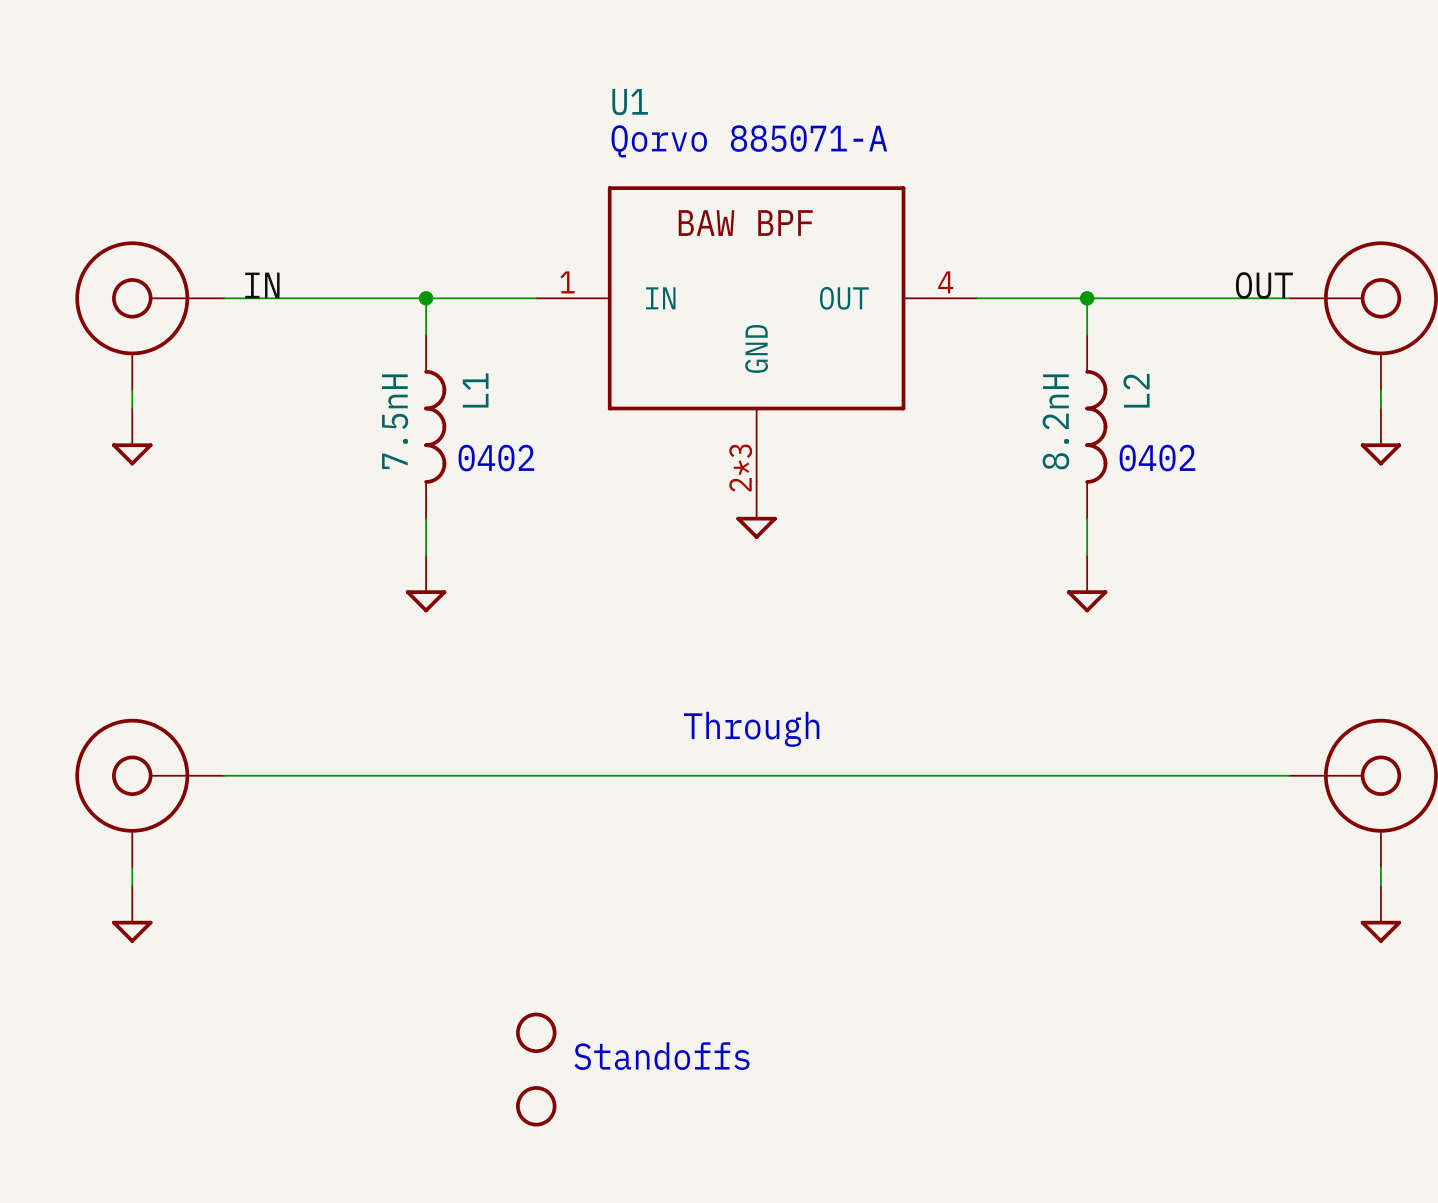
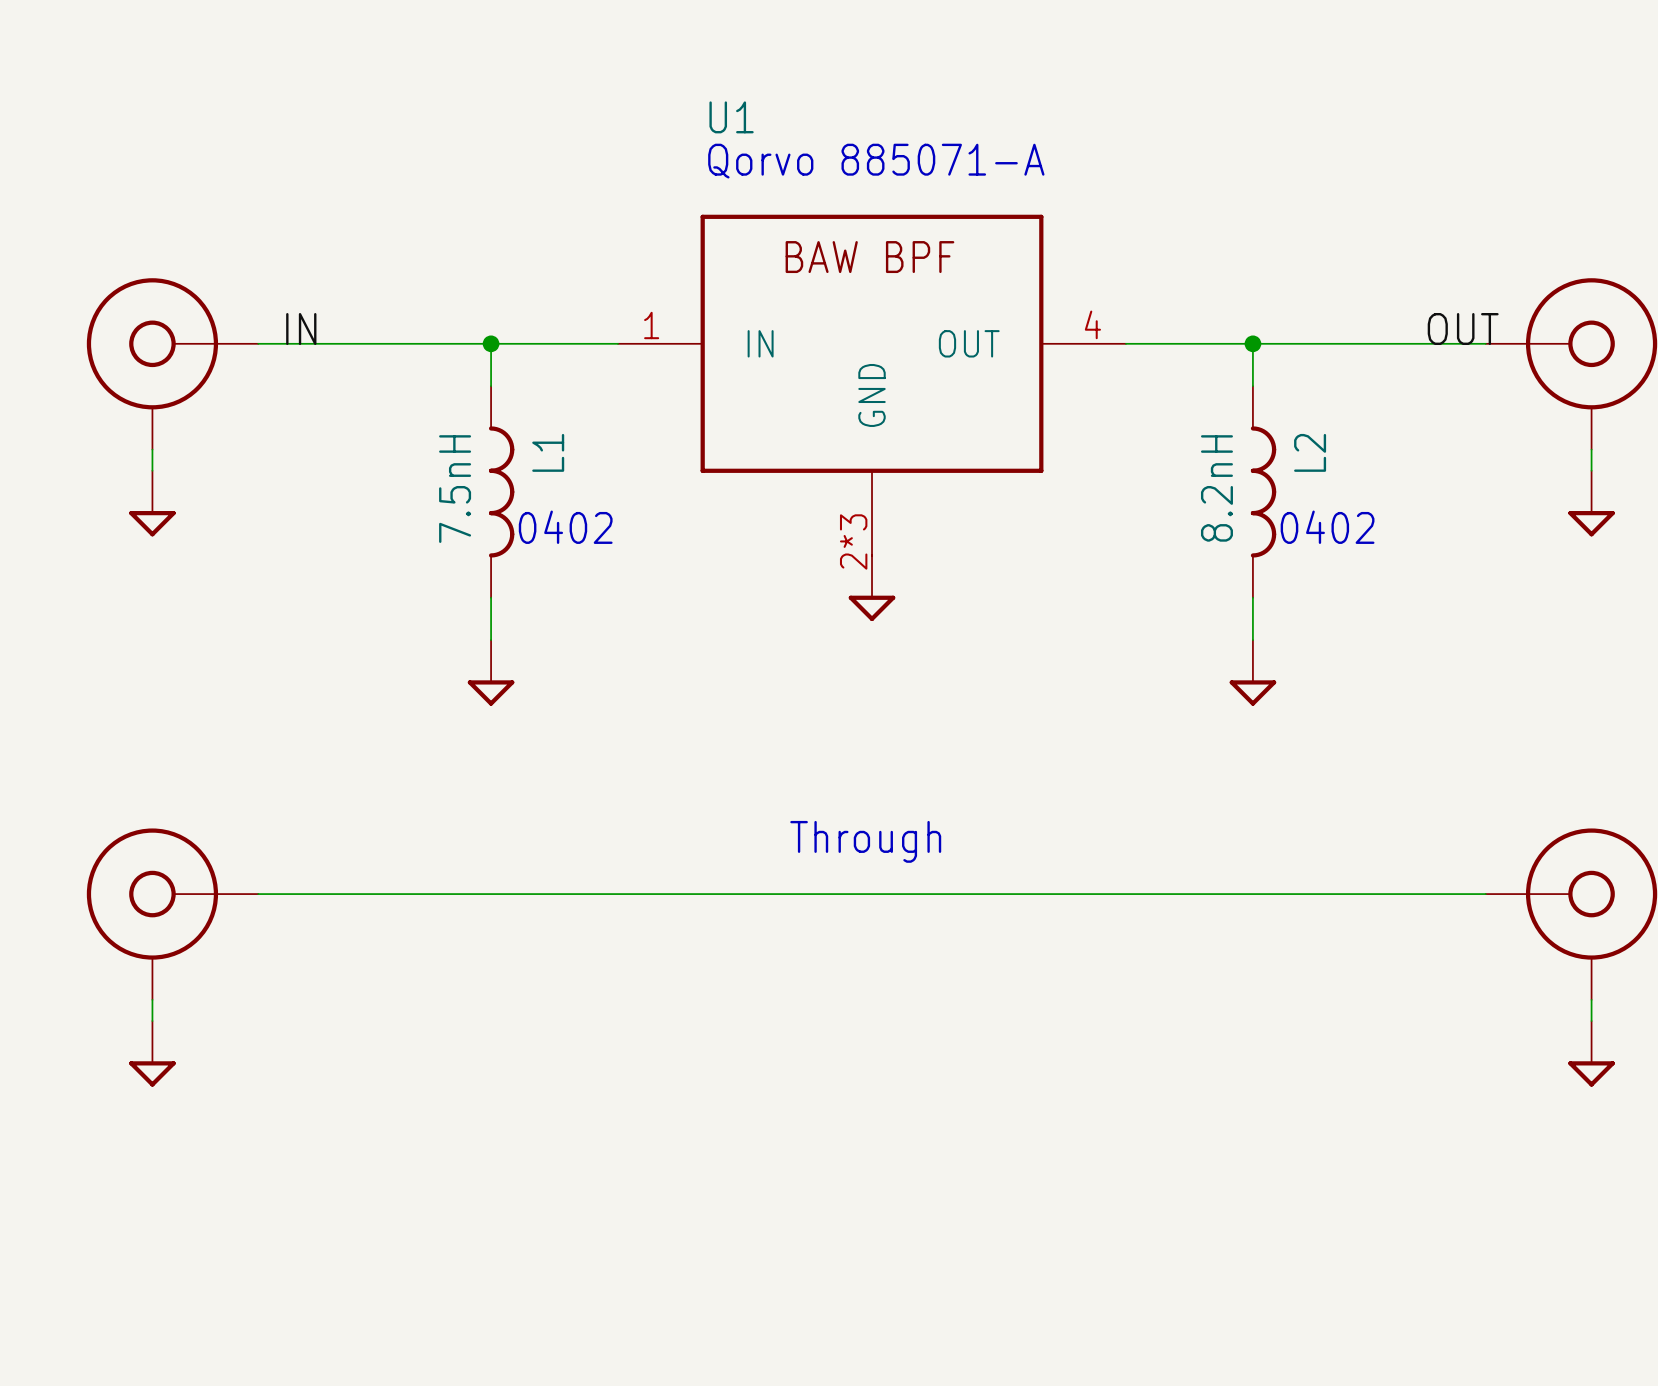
part: (536, 1032) -> none
text: Standoffs (661, 1056) -> none
part: (536, 1106) -> none

